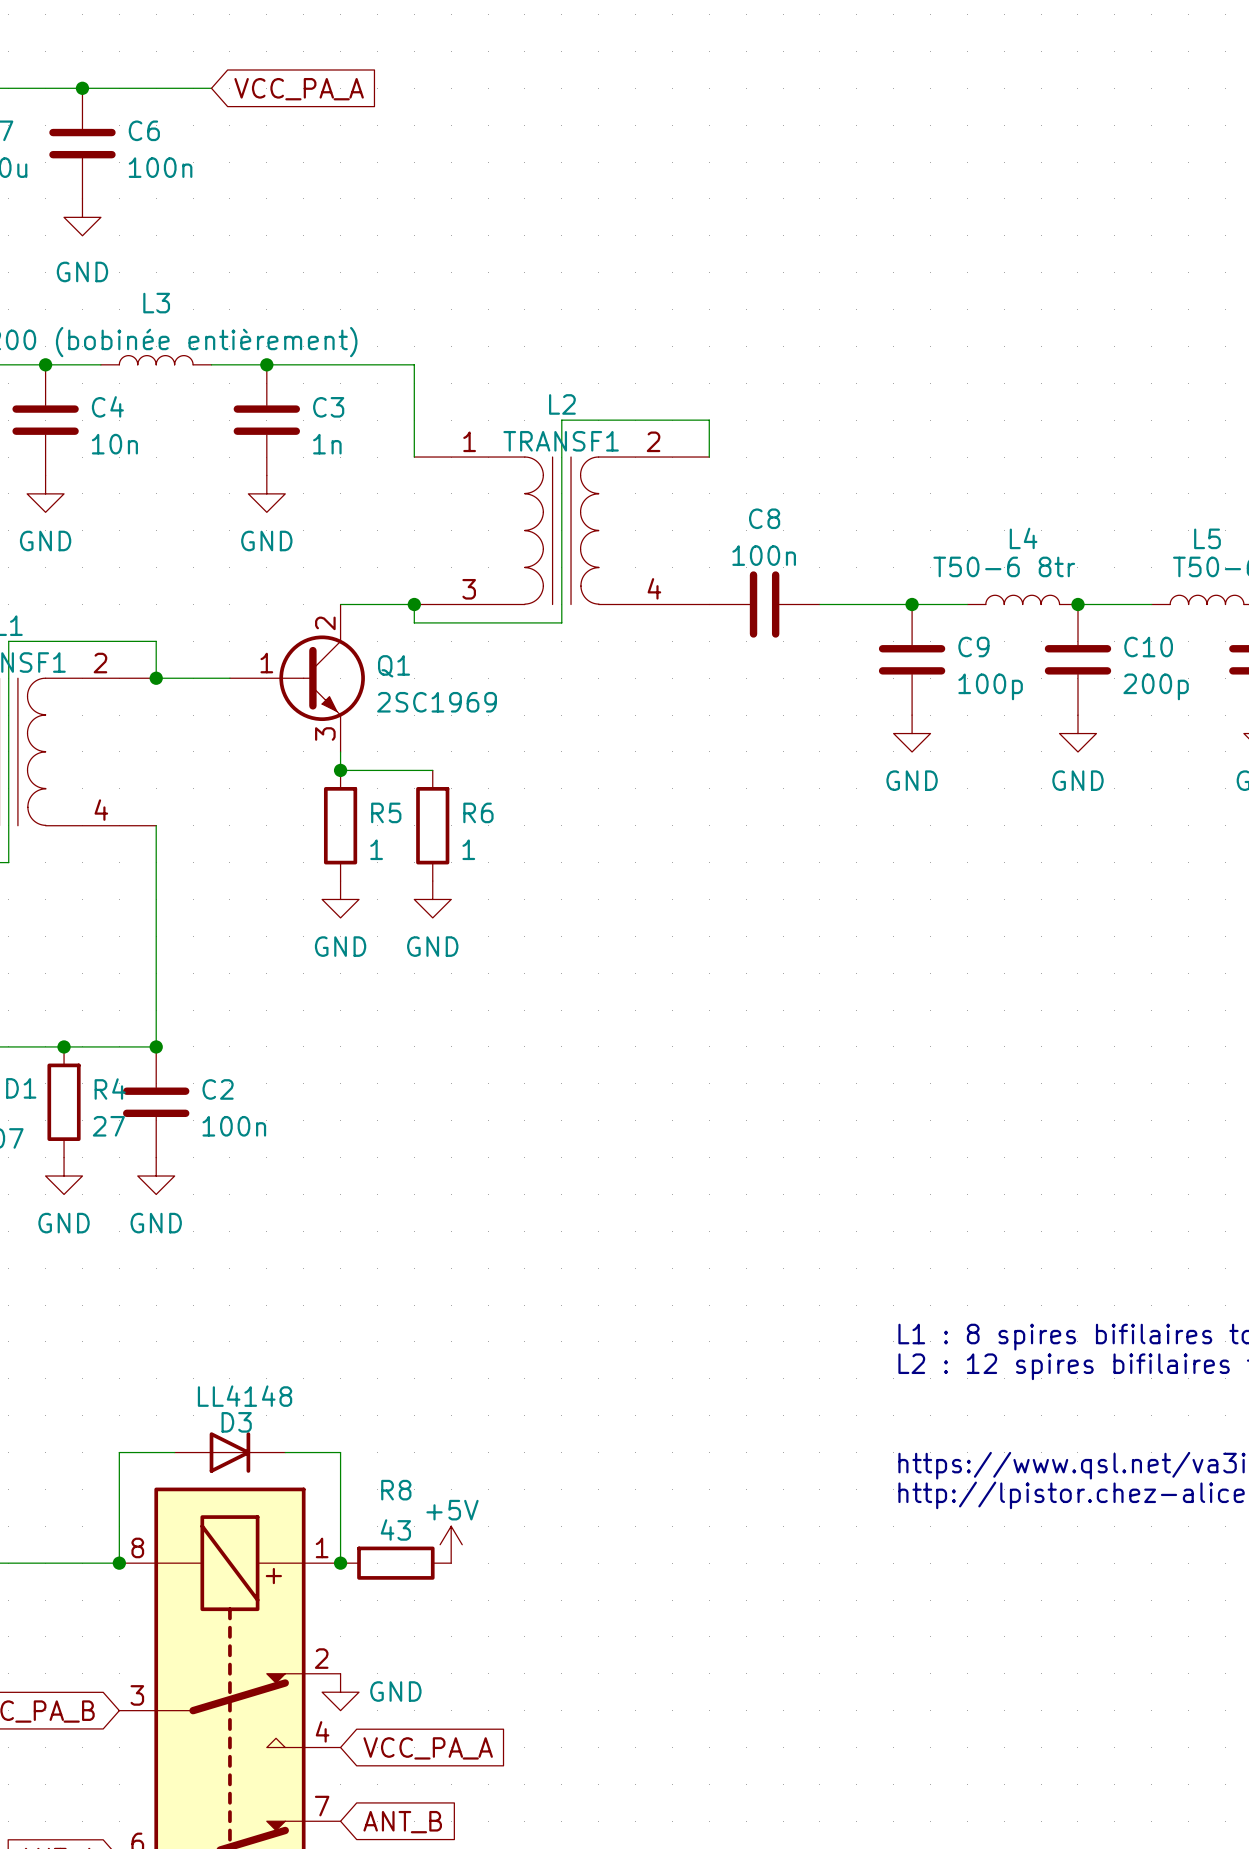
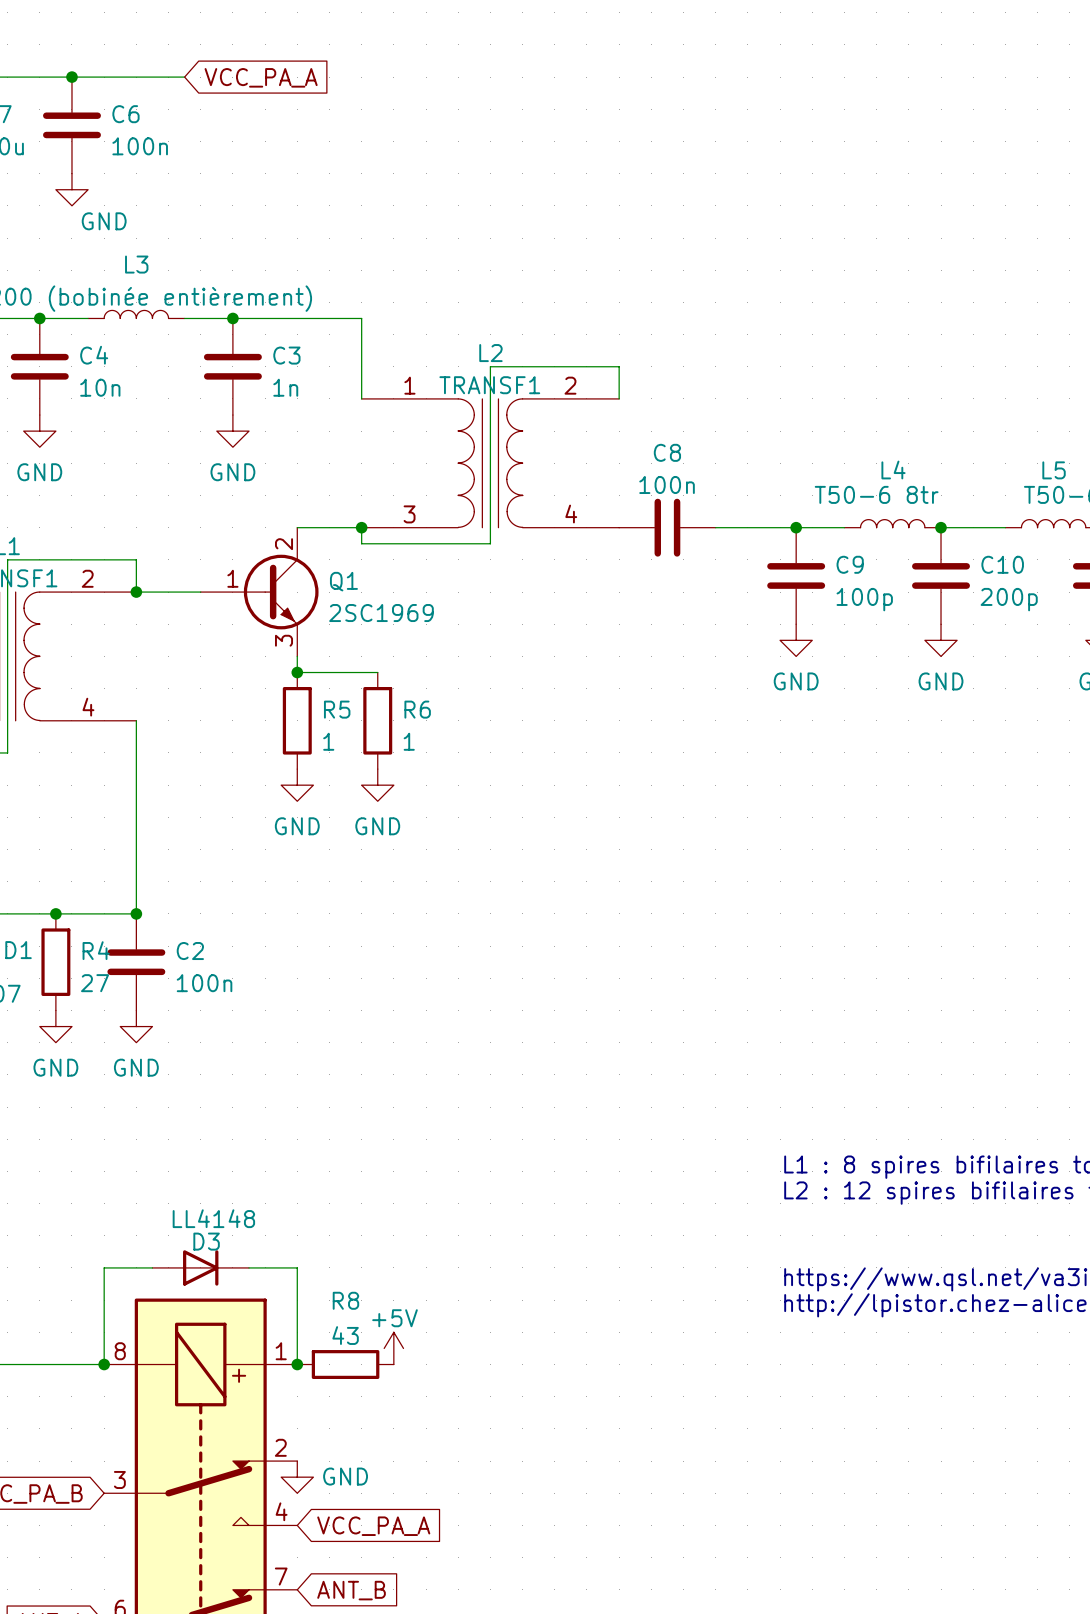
power symbol text position: GND (82, 271) -> GND (104, 221)

